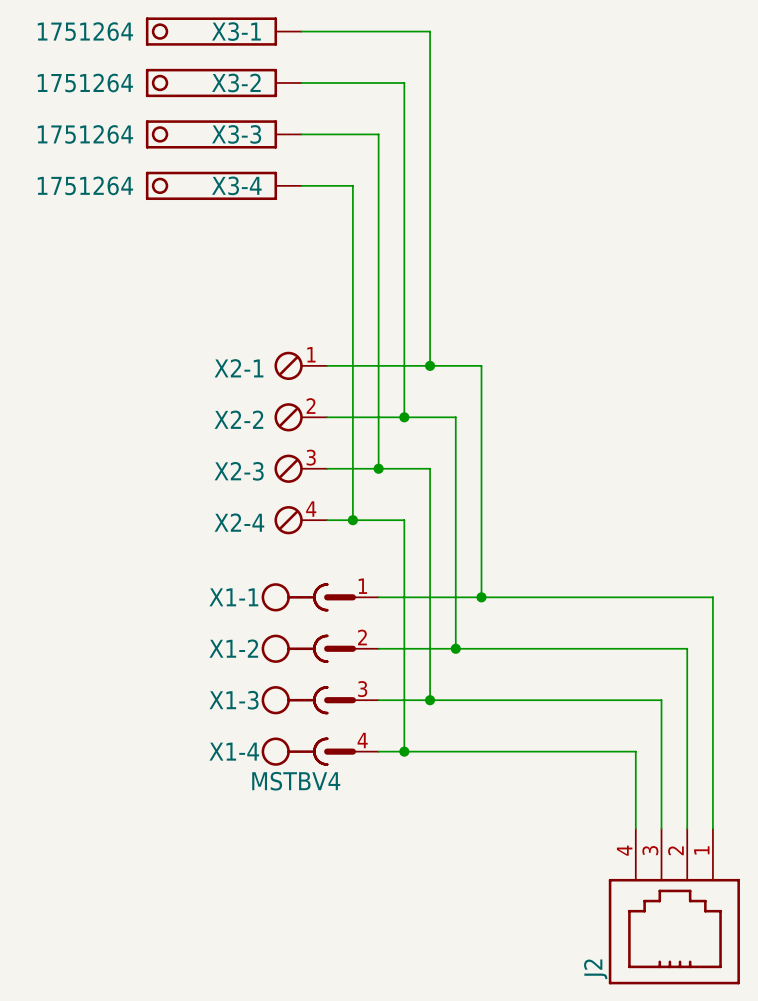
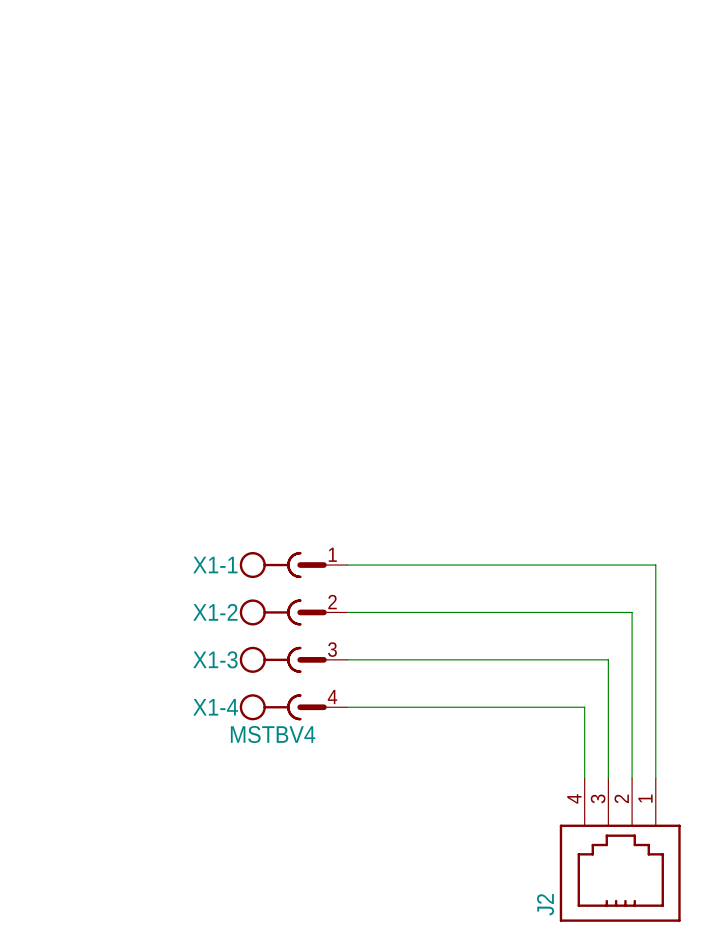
X3-1: 1751264 (223, 31) -> none
wire: (301, 31) (430, 31) (430, 365) -> none
X3-2: 1751264 (223, 82) -> none
wire: (301, 82) (404, 82) (404, 417) -> none
X3-3: 1751264 (223, 134) -> none
wire: (301, 134) (378, 134) (378, 468) -> none
X3-4: 1751264 (223, 185) -> none
wire: (301, 185) (352, 185) (352, 520) -> none
X2-1: (300, 365) -> none
wire: (327, 365) (481, 365) (481, 597) -> none
junction: (430, 365) -> none
X2-2: (300, 417) -> none
wire: (327, 417) (455, 417) (455, 648) -> none
junction: (404, 417) -> none
X2-3: (300, 468) -> none
wire: (327, 468) (430, 468) (430, 700) -> none
junction: (378, 468) -> none
X2-4: (300, 520) -> none
wire: (327, 520) (404, 520) (404, 751) -> none
junction: (352, 520) -> none
junction: (481, 597) -> none
junction: (455, 648) -> none
junction: (430, 700) -> none
junction: (404, 751) -> none

